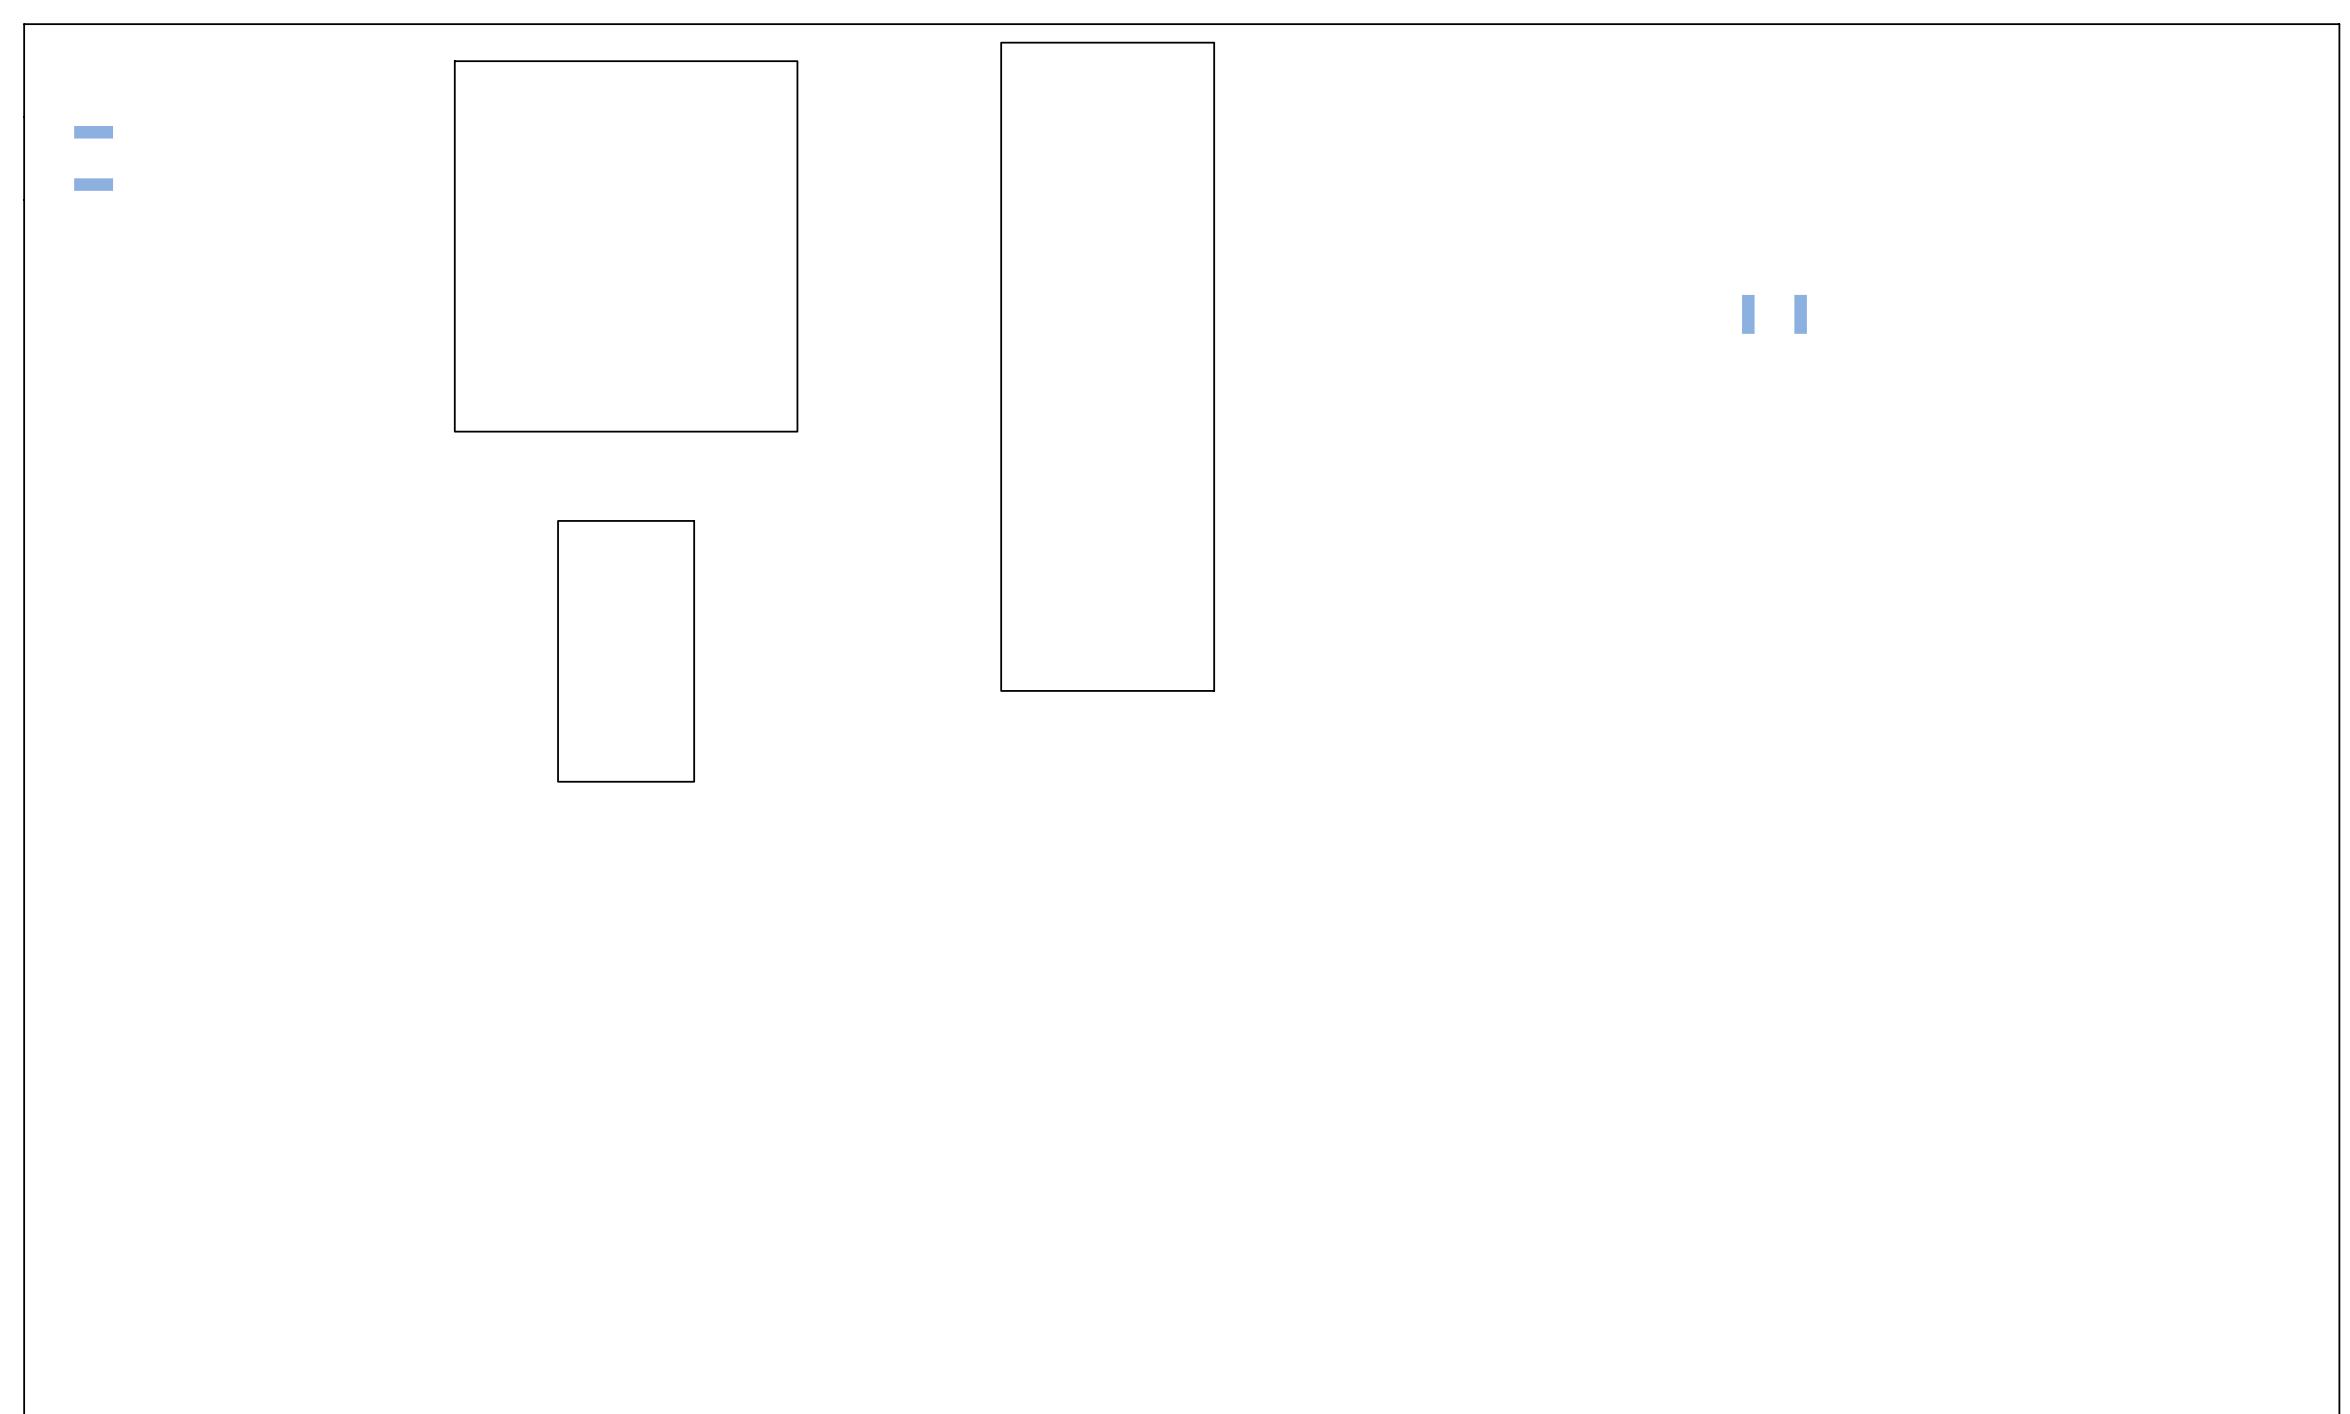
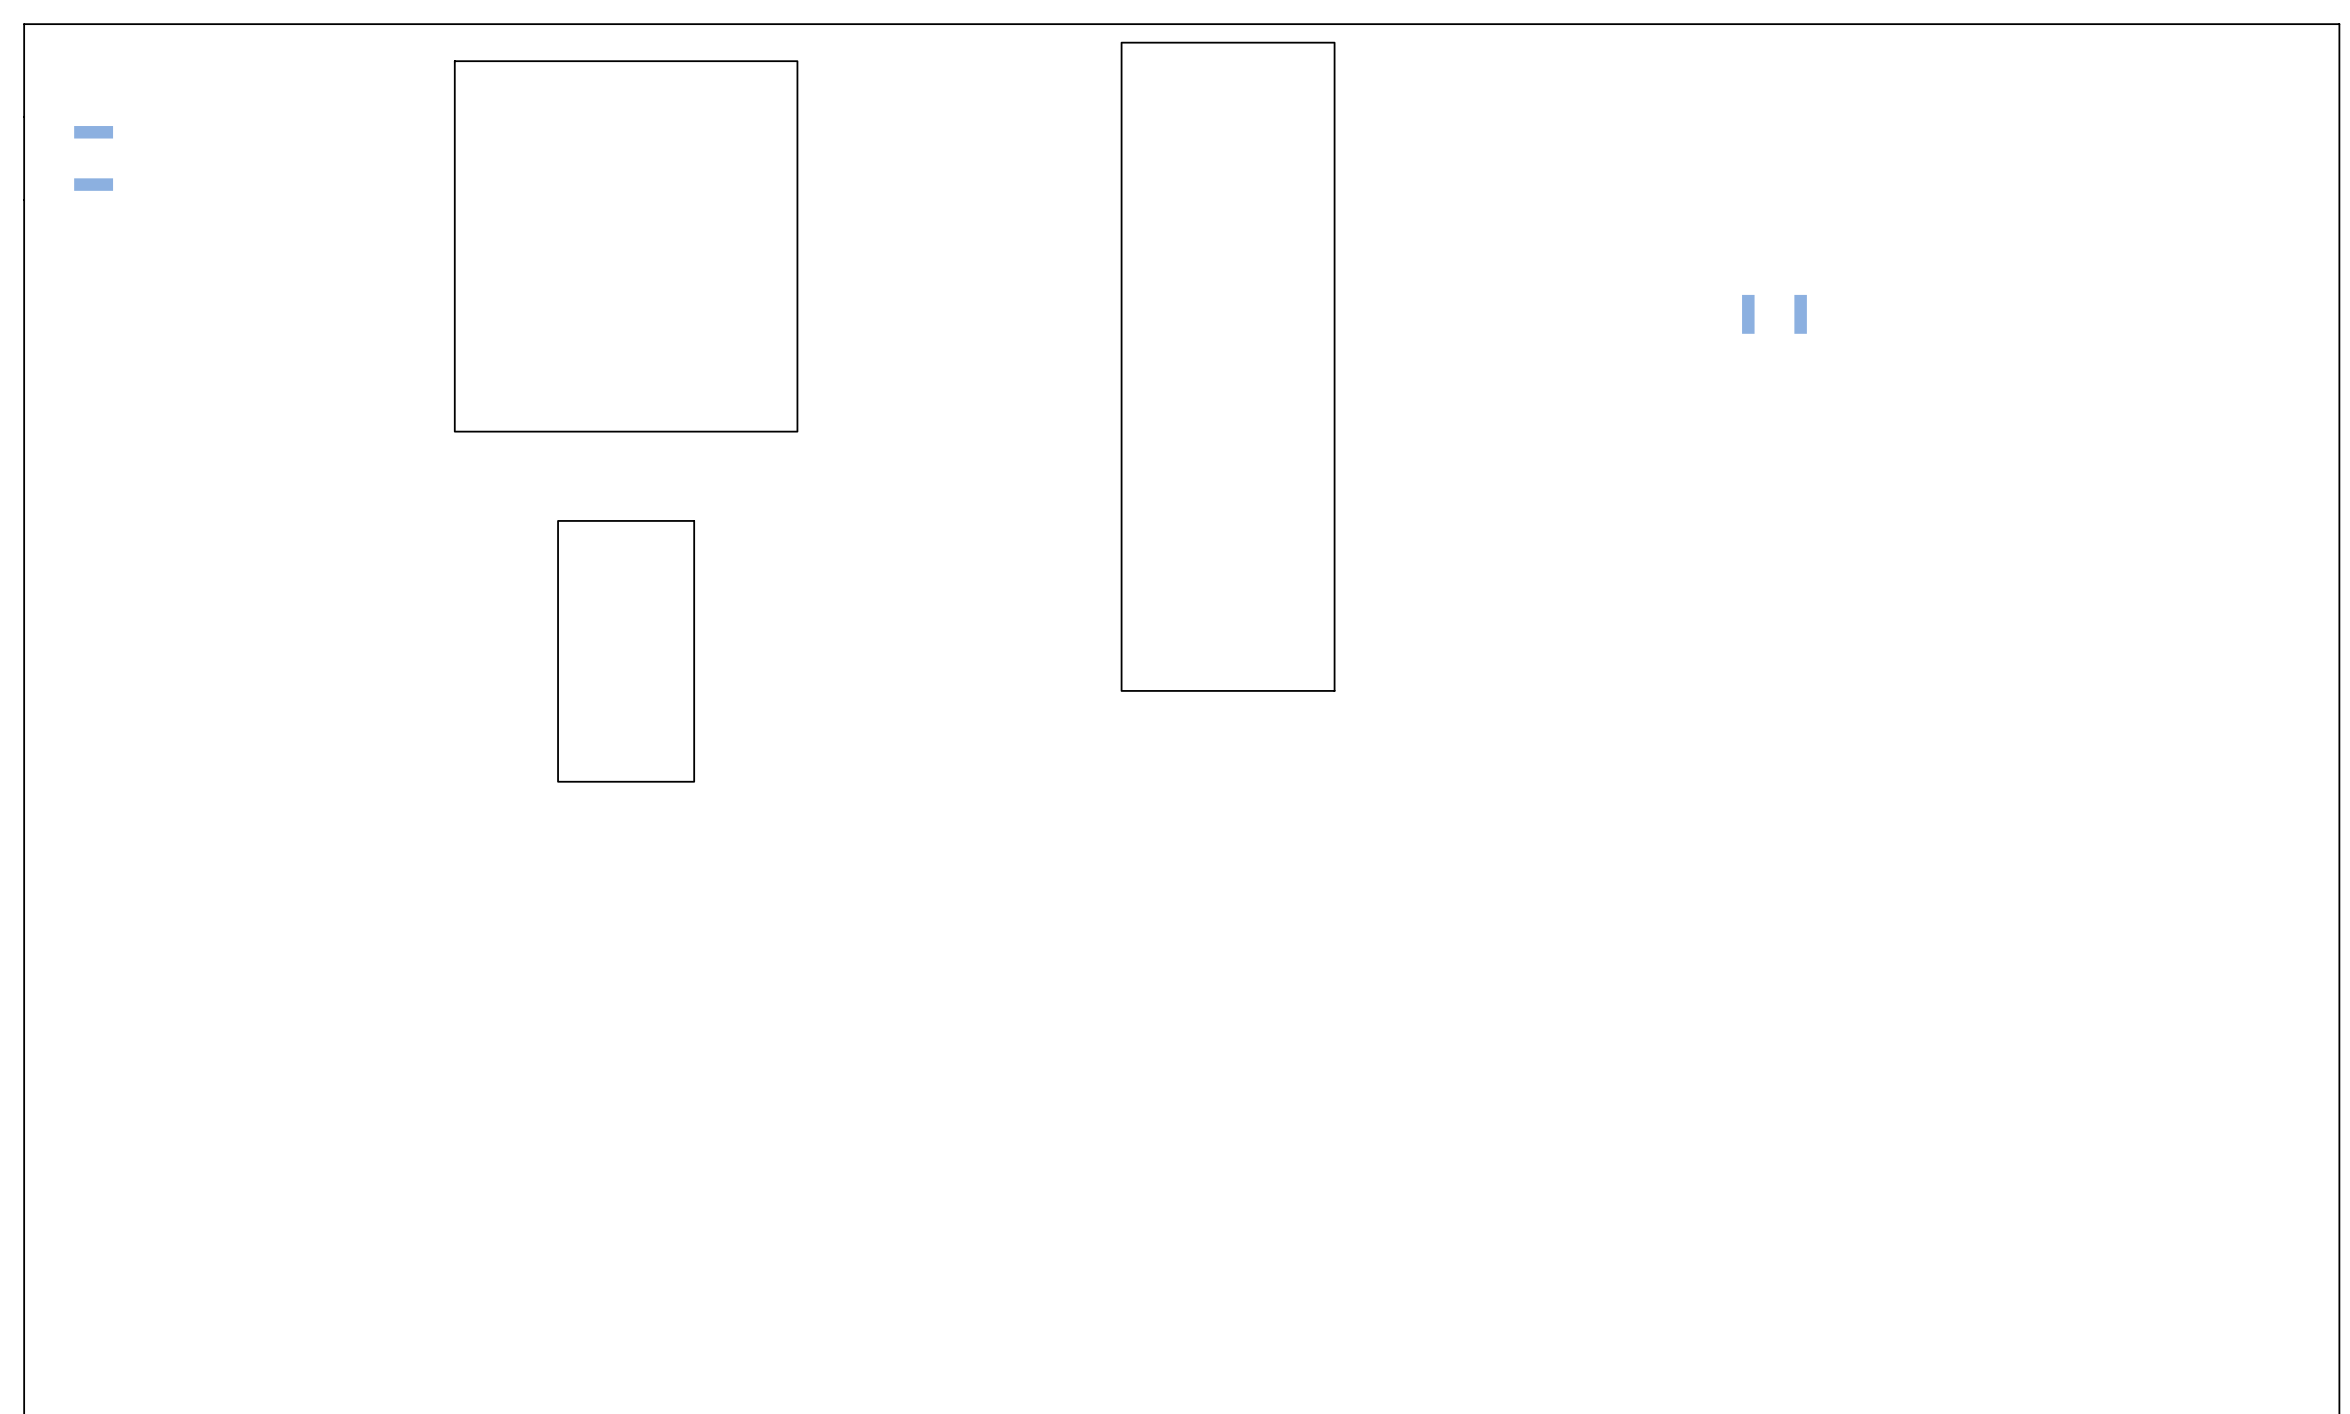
part position: (1107, 366) -> (1228, 366)

